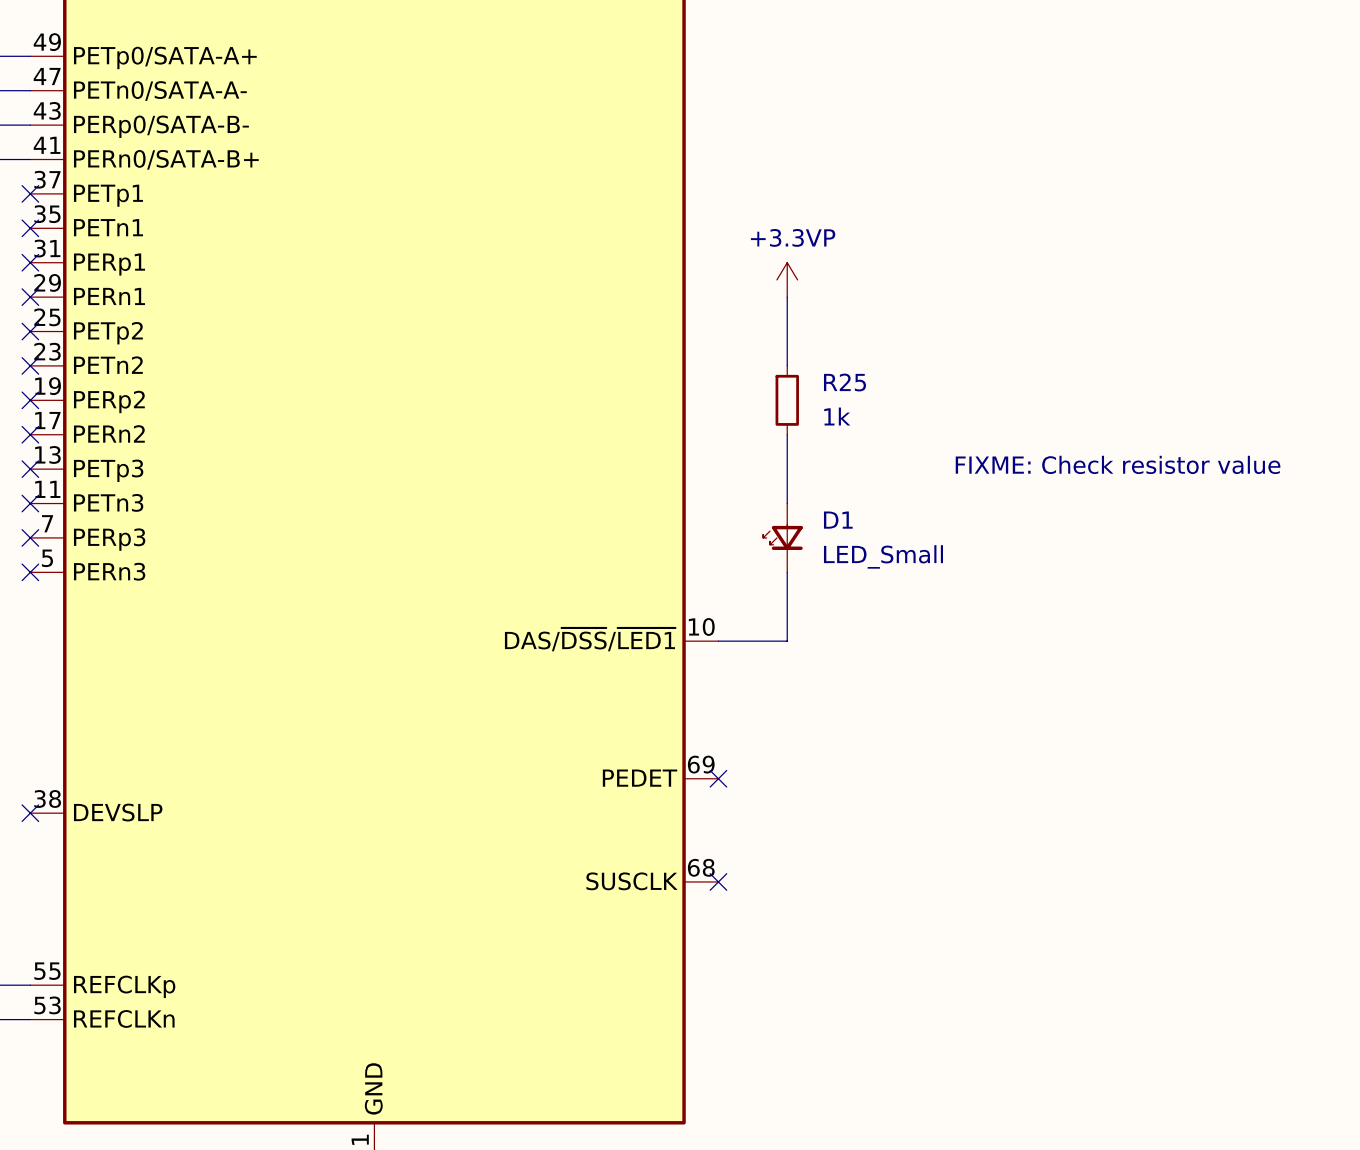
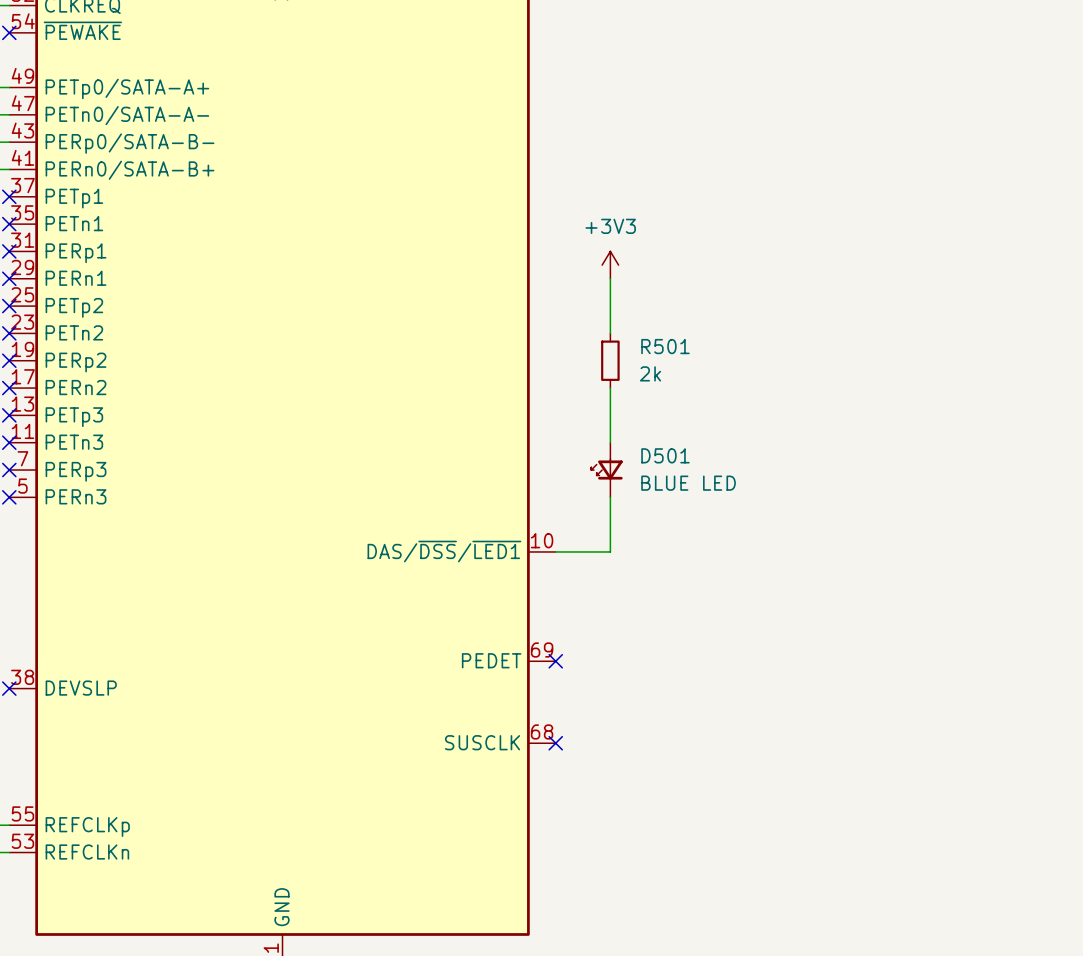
power symbol: +3.3VP (787, 279) -> +3V3 (610, 265)
R25 name: R25 (844, 382) -> R501 (665, 346)
R25 value: 1k (837, 416) -> 2k (650, 373)
text: FIXME: Check resistor value (1118, 464) -> none
D1 name: D1 (838, 520) -> D501 (665, 455)
D1 value: LED_Small (883, 556) -> BLUE LED (688, 483)

